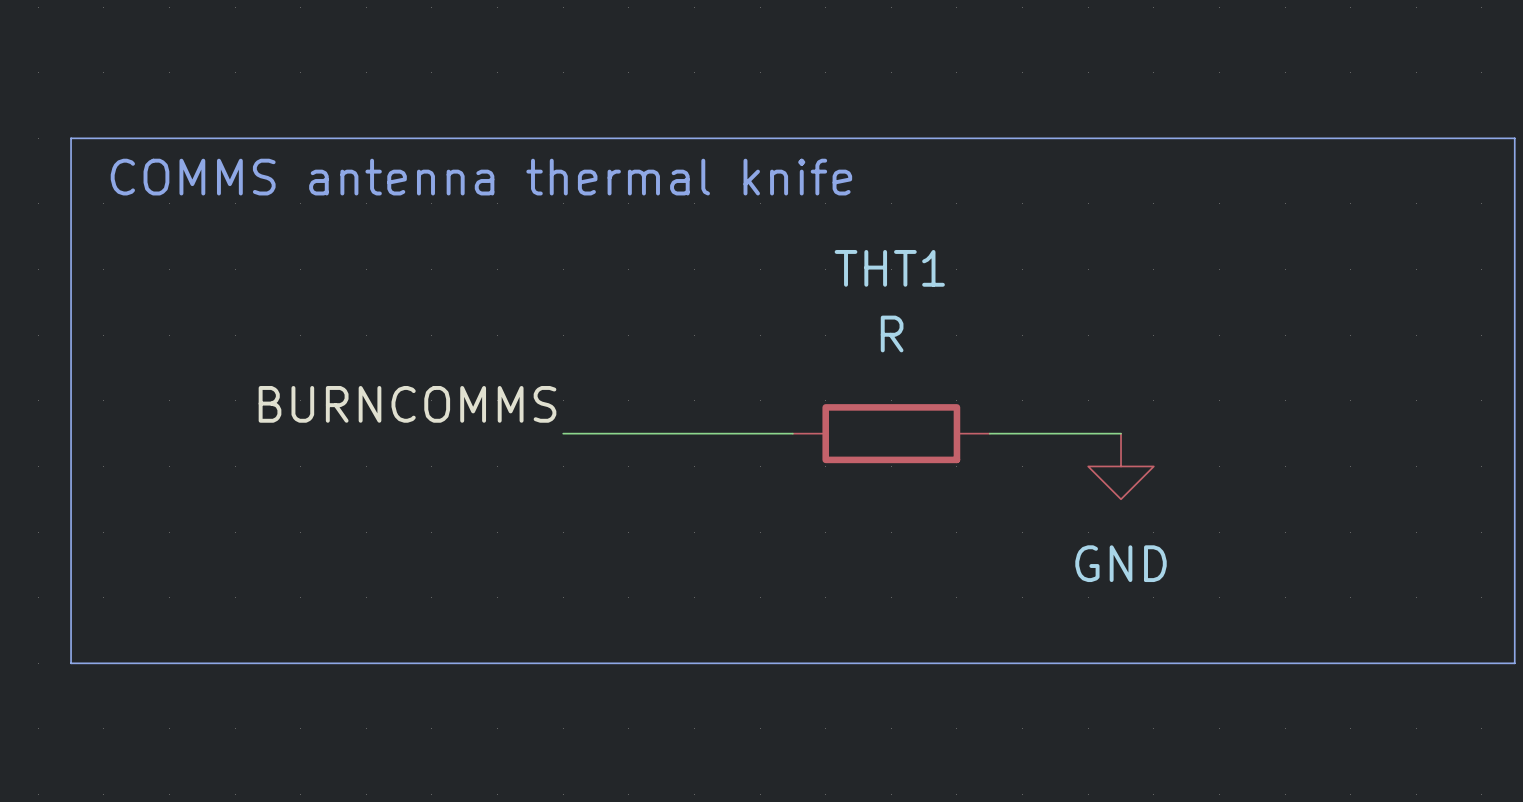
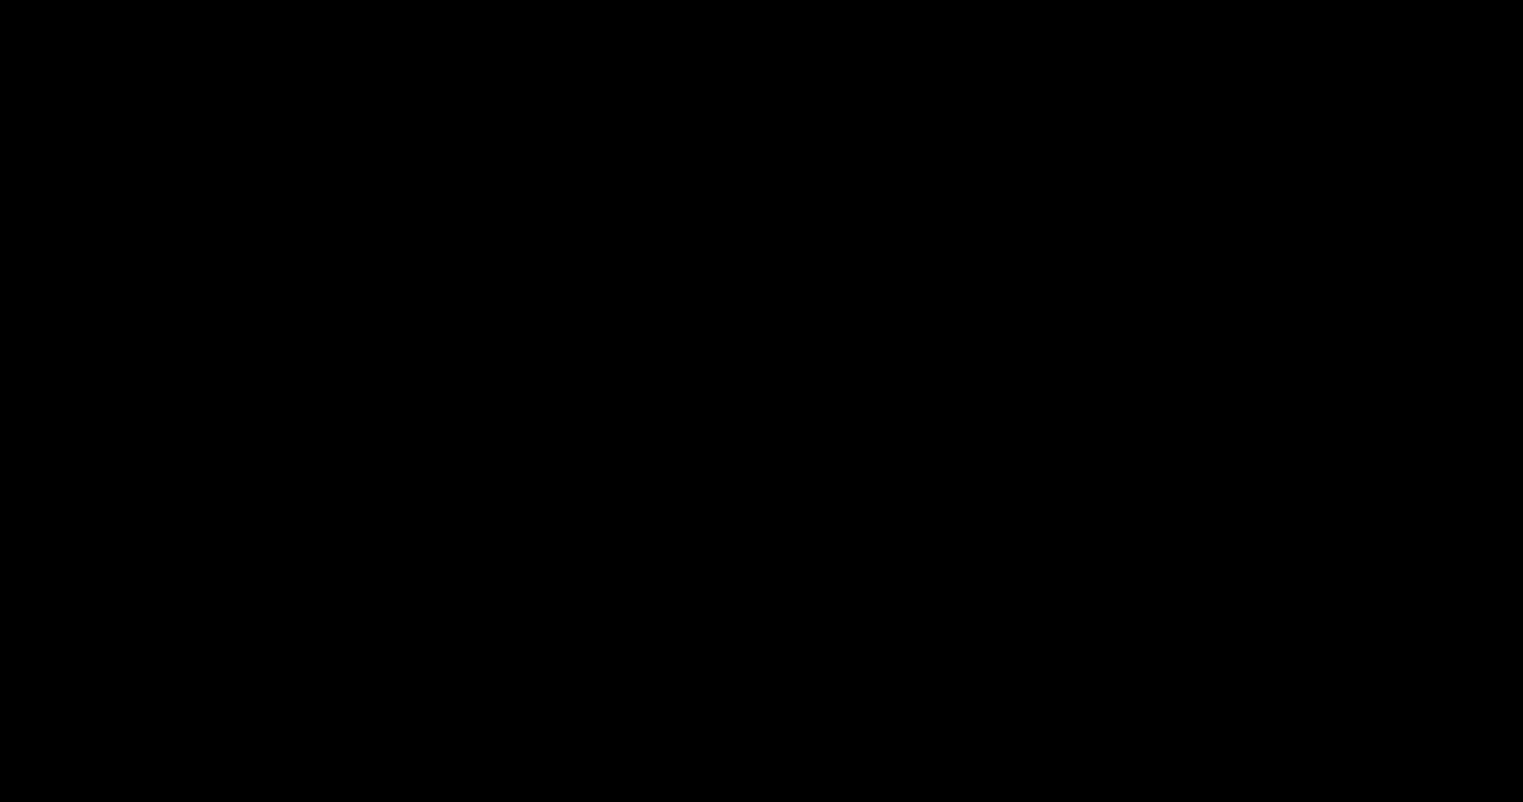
line: (71, 138) (71, 663) (1514, 663) (1514, 138) (71, 138) -> none
text: COMMS antenna thermal knife (481, 177) -> none
label: BURNCOMMS (407, 404) -> none
wire: (563, 433) (792, 433) -> none
THT1: R (891, 433) -> none
wire: (989, 433) (1121, 433) -> none
power symbol: GND (1121, 466) -> none

